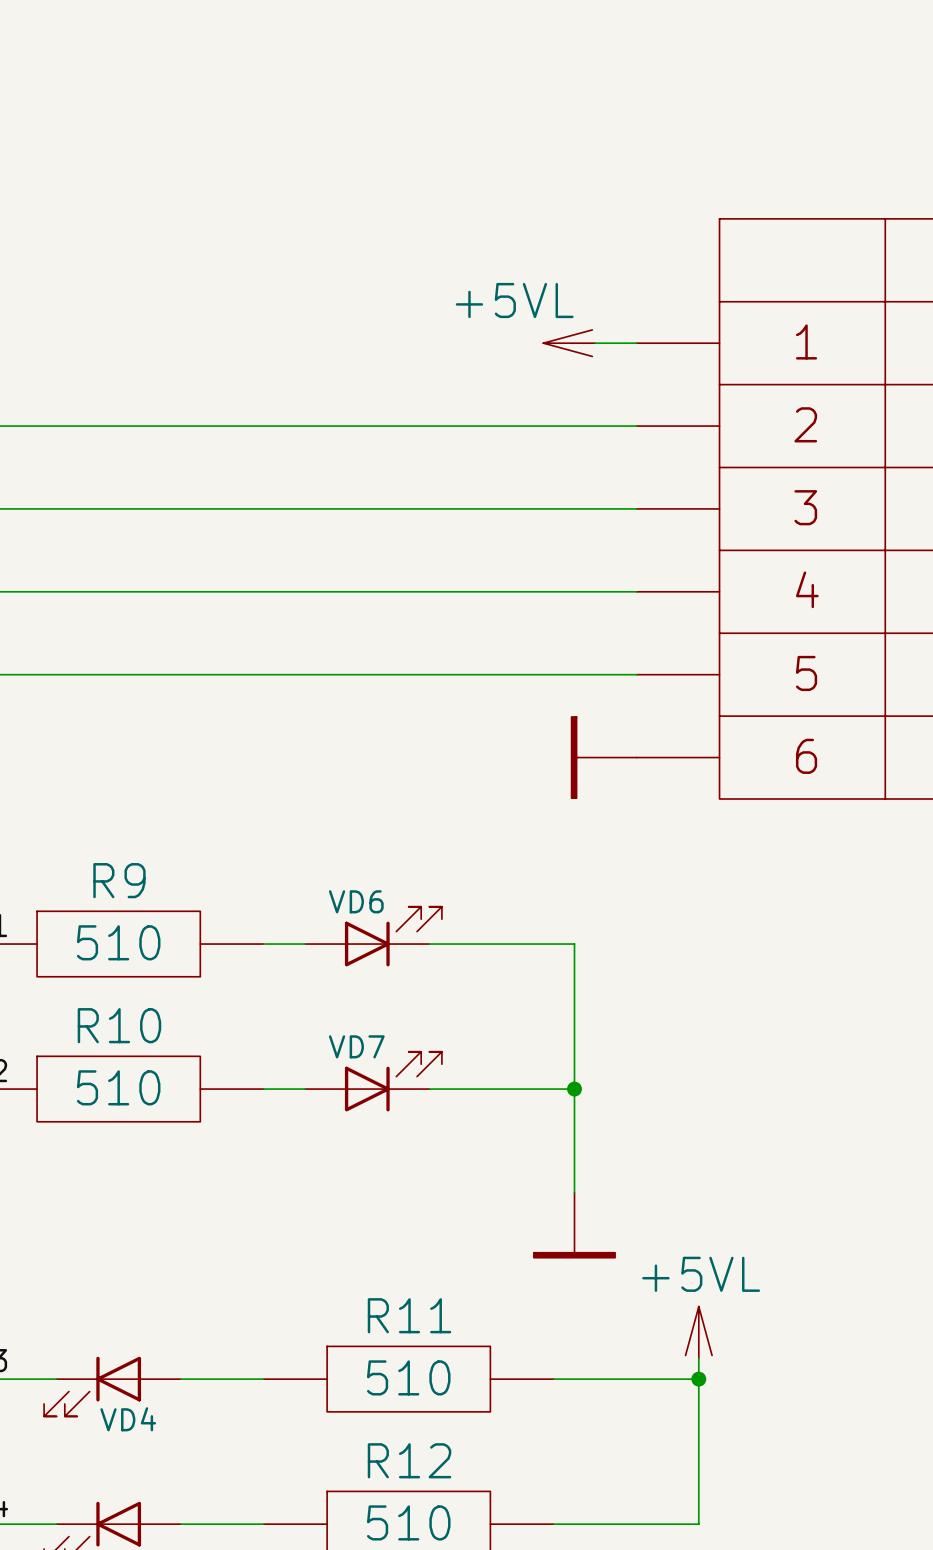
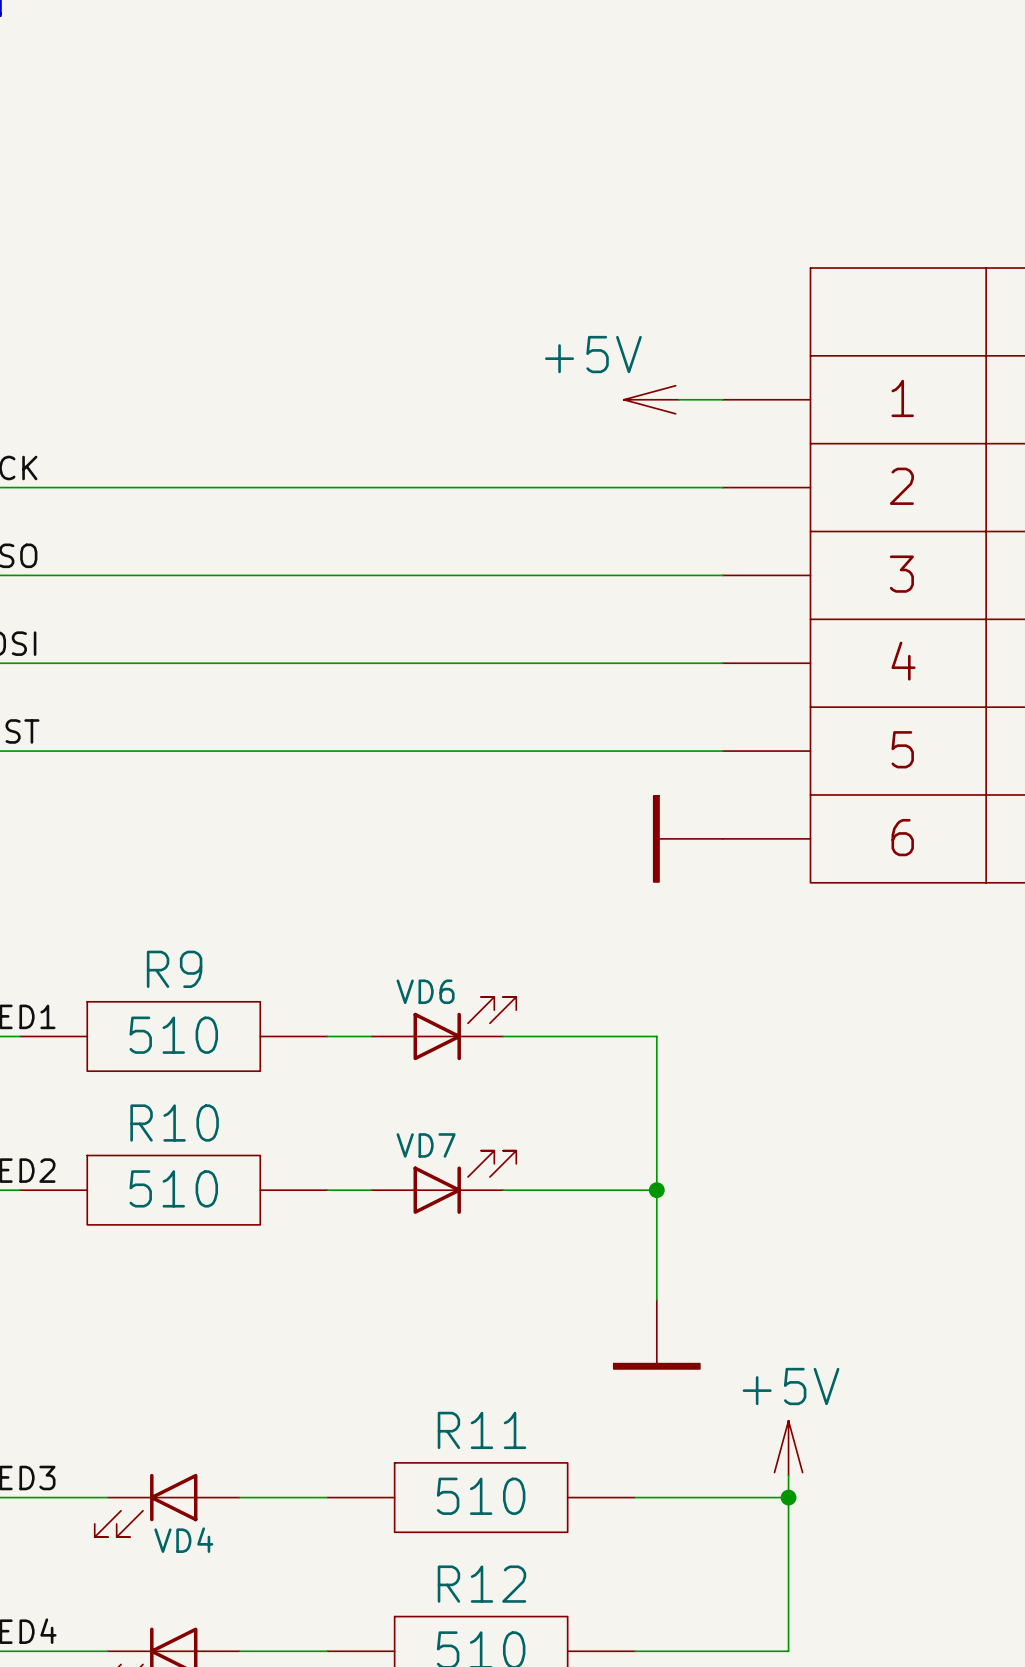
power symbol: +5VL (569, 343) -> +5V (651, 399)
power symbol: +5VL (698, 1332) -> +5V (788, 1448)

